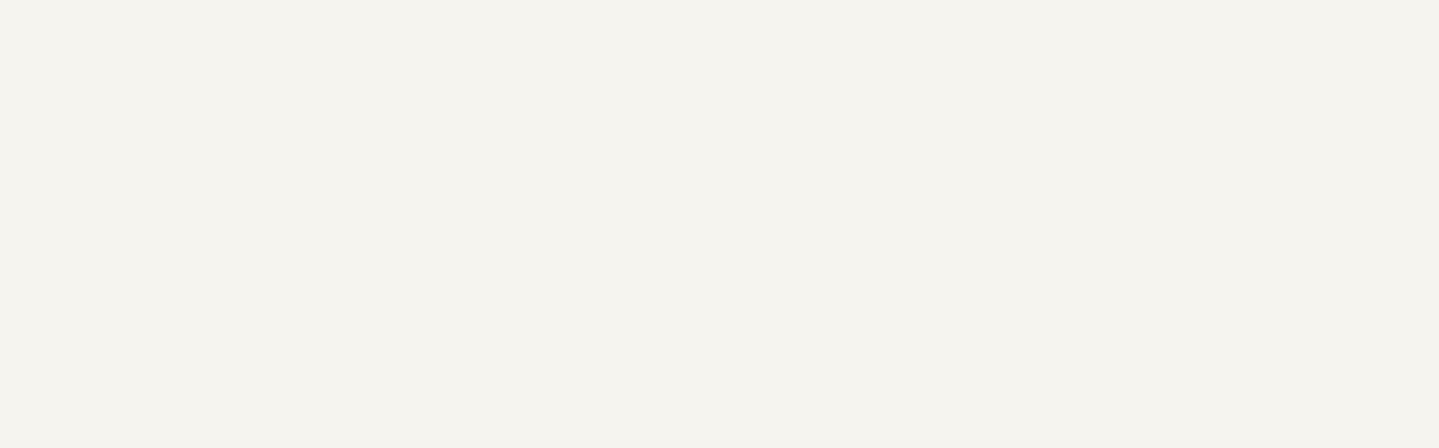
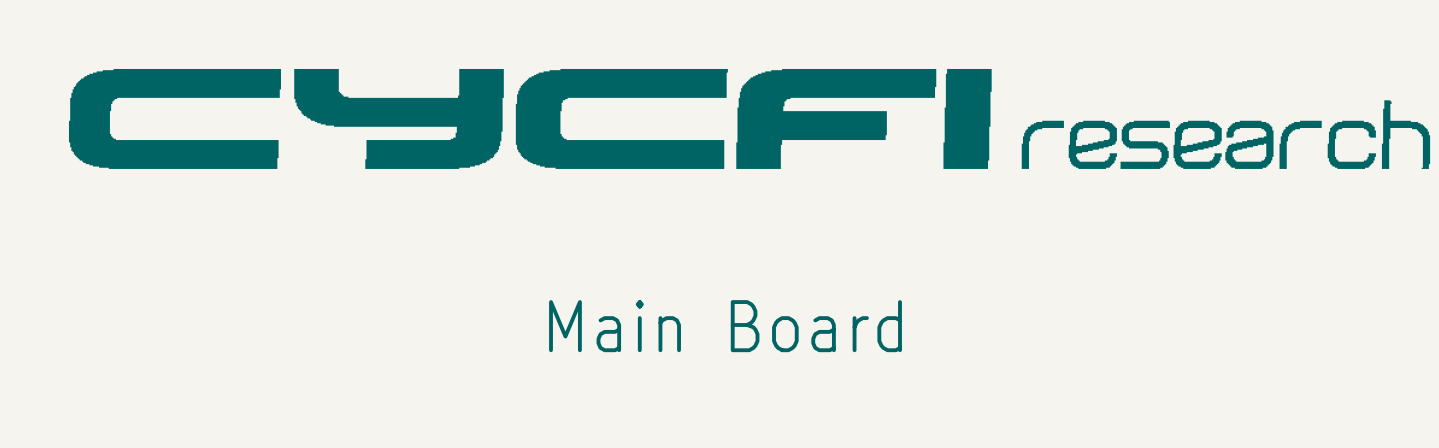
drawing: none -> [68, 68, 992, 169]
drawing: none -> [1021, 100, 1431, 169]
text: none -> Main Board (725, 326)

